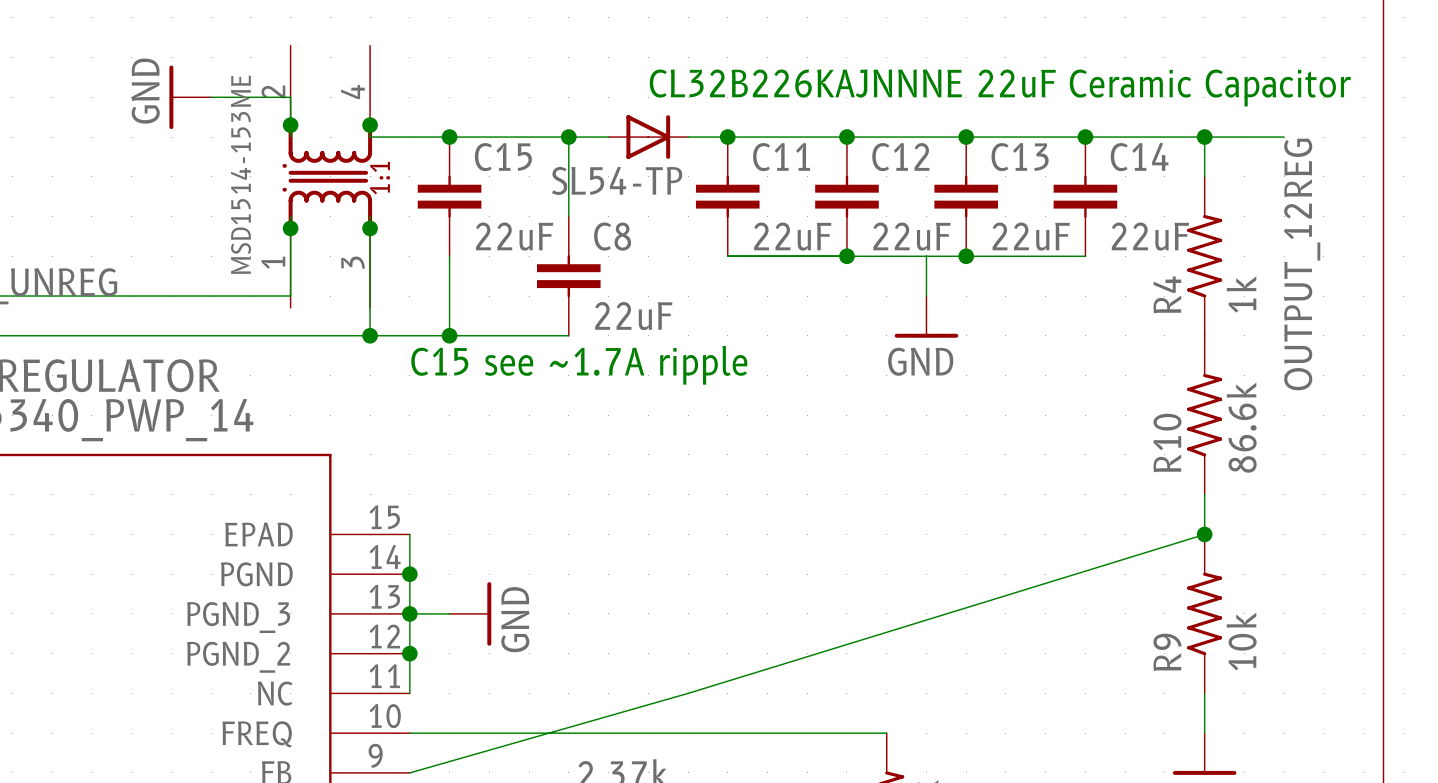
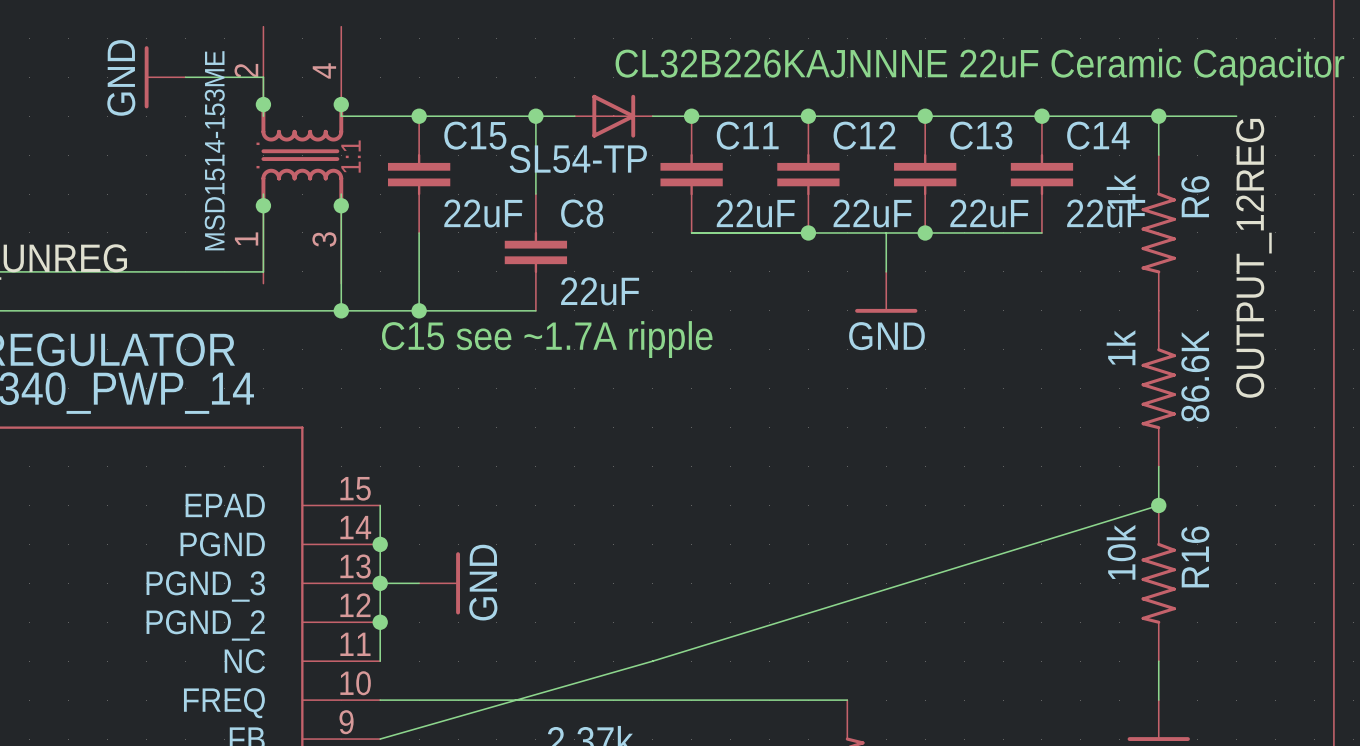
R4: 1k (1204, 256) -> none
R6: none -> 1k (1158, 232)
R10: 86.6k (1204, 415) -> none
86.6K: none -> 1k (1158, 388)
R9: 10k (1204, 613) -> none
R16: none -> 10k (1158, 583)

